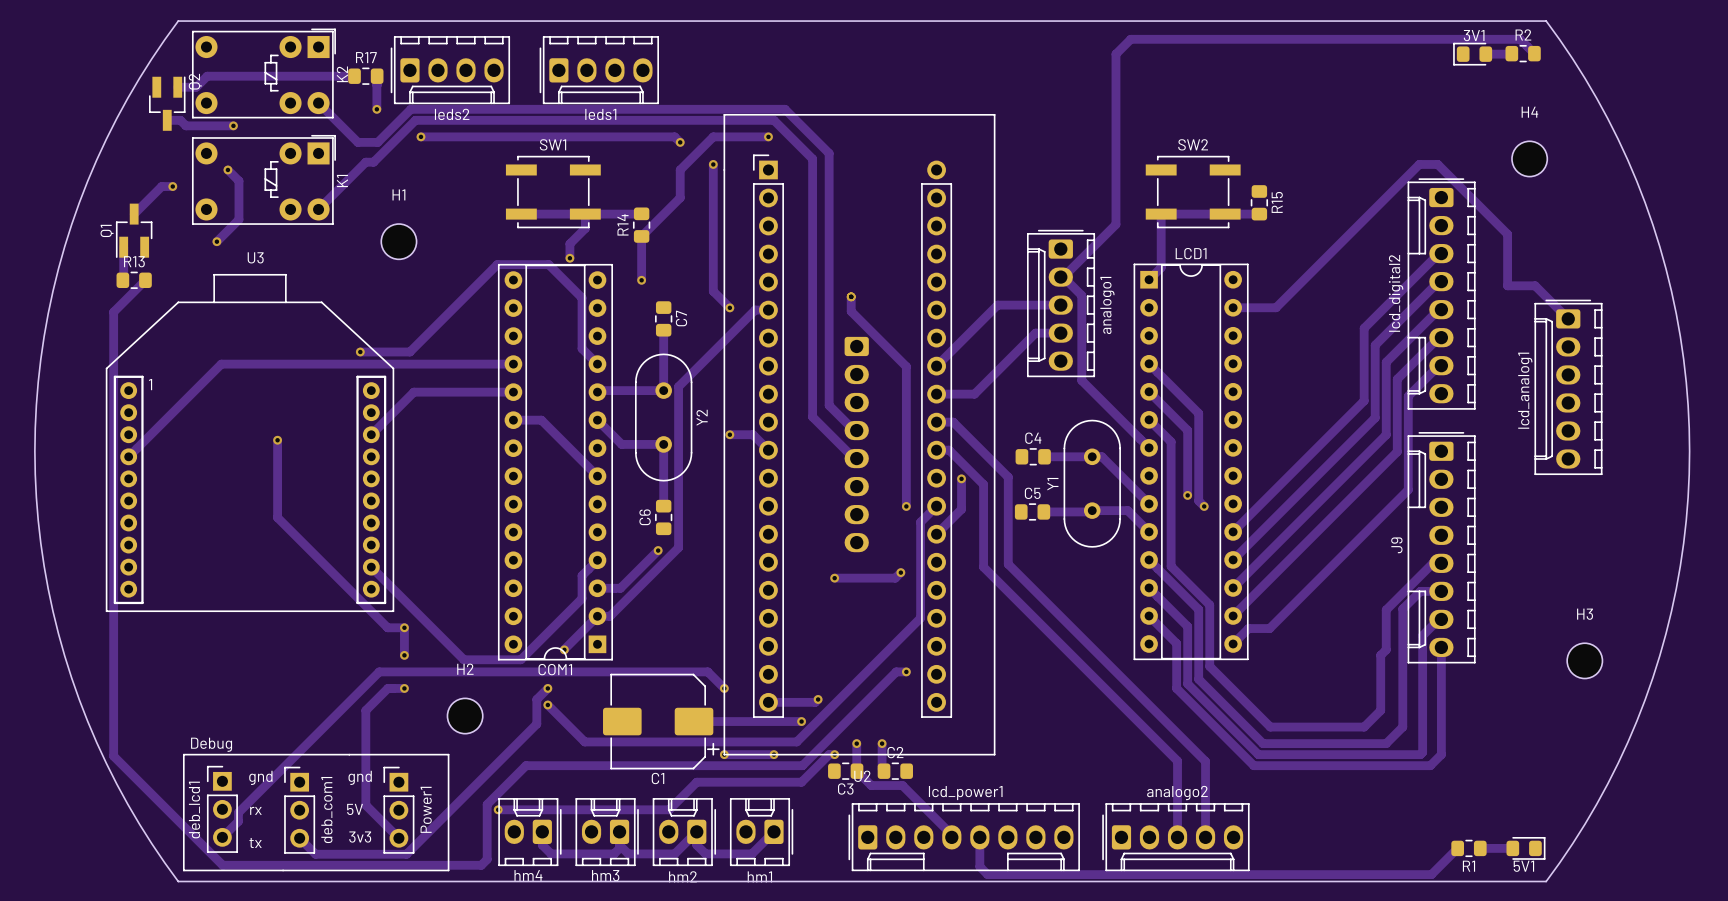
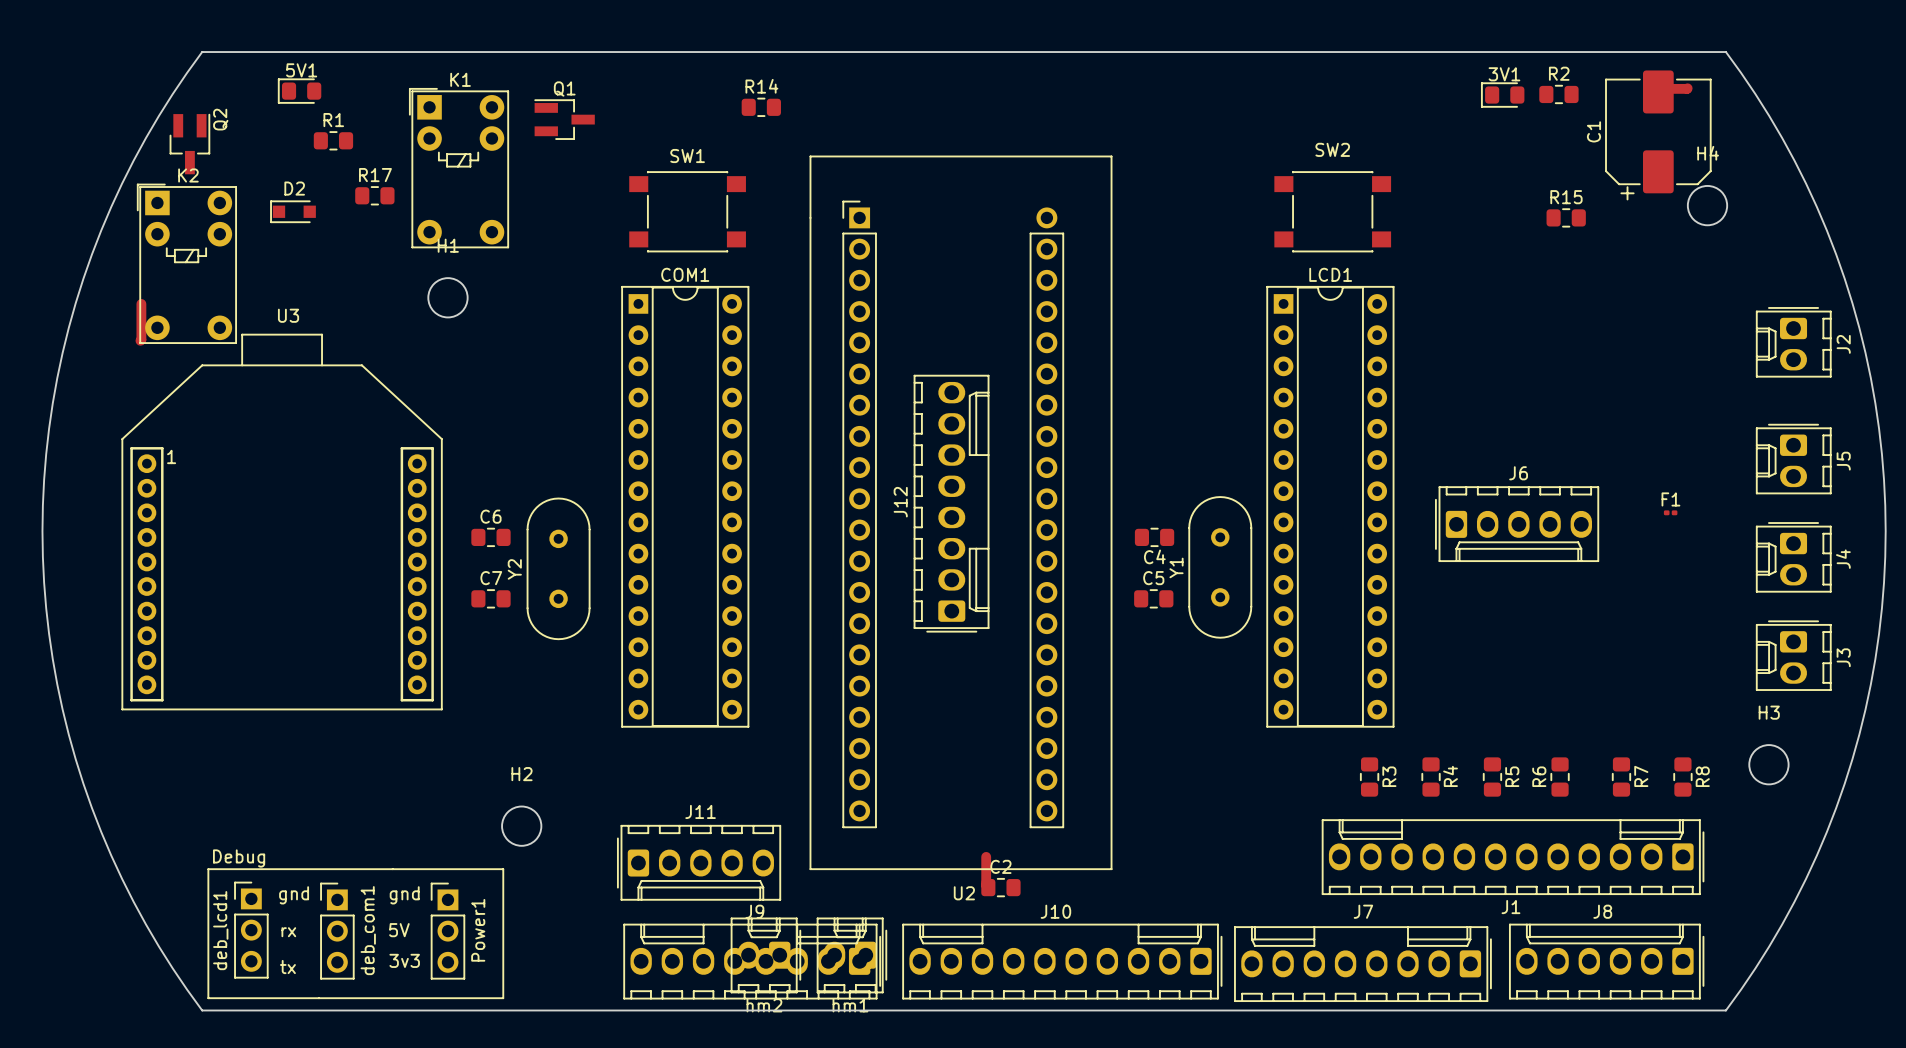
R2 position: (1523, 53) -> (1558, 94)
track: (1534, 53) (1520, 39) (1130, 39) (1115, 54) (1115, 224) (1063, 277) -> none
3V1 position: (1472, 54) -> (1502, 95)
leds2: (450, 70) -> none
leds1: (599, 70) -> none
K2 rotation: 0° (263, 73) -> 90° counterclockwise (186, 263)
K2 position: (263, 73) -> (186, 263)
track: (354, 76) (207, 76) (196, 87) (177, 87) -> none
R17 position: (365, 76) -> (374, 195)
track: (377, 76) (376, 109) -> none
track: (318, 103) (357, 142) (377, 142) (410, 109) (785, 109) (829, 153) (829, 405) (854, 430) (856, 430) -> none
via: (376, 109) -> none
track: (167, 120) (180, 120) (186, 125) (233, 125) -> none
via: (233, 125) -> none
track: (420, 136) (674, 136) (680, 142) -> none
via: (420, 136) -> none
track: (768, 136) (713, 136) (680, 169) (680, 197) (641, 236) (641, 280) -> none
via: (768, 136) -> none
via: (680, 142) -> none
SW1 footprint: [505, 155, 601, 229] -> [629, 171, 746, 253]
SW2 footprint: [1145, 155, 1241, 229] -> [1274, 171, 1392, 253]
D2: none -> (293, 211)
track: (713, 164) (713, 291) (729, 307) -> none
via: (713, 164) -> none
track: (227, 169) (238, 181) (238, 219) (216, 241) -> none
via: (227, 169) -> none
K1 rotation: 0° (263, 179) -> 90° counterclockwise (459, 168)
K1 position: (263, 179) -> (459, 168)
track: (172, 186) (161, 186) (134, 214) -> none
via: (172, 186) -> none
R15 rotation: 0° (1259, 202) -> 90° clockwise (1566, 217)
R15 position: (1259, 202) -> (1566, 217)
R15 name position: R15 (1277, 202) -> R15 (1566, 197)
track: (318, 209) (365, 162) (373, 162) (415, 120) (773, 120) (812, 158) (812, 416) (854, 458) (856, 458) -> none
track: (641, 213) (521, 214) -> none
track: (585, 214) (585, 228) (569, 243) (569, 258) -> none
track: (1259, 214) (1161, 214) (1161, 267) (1149, 279) -> none
R14 rotation: 0° (641, 225) -> 90° clockwise (761, 107)
R14 position: (641, 225) -> (761, 107)
Q1 rotation: 0° (134, 230) -> 90° clockwise (564, 119)
Q1 position: (134, 230) -> (564, 119)
via: (216, 241) -> none
track: (1441, 253) (1438, 253) (1364, 328) (1364, 400) (1233, 531) -> none
via: (569, 258) -> none
track: (1063, 277) (1081, 295) (1081, 380) (1149, 447) -> none
R13: (134, 280) -> none
track: (145, 280) (113, 312) (113, 756) (222, 865) (481, 865) (487, 859) (487, 804) (526, 765) (802, 765) (896, 671) (906, 671) -> none
via: (641, 280) -> none
track: (1441, 281) (1438, 281) (1375, 345) (1375, 417) (1233, 559) -> none
J2: none -> (1793, 342)
lcd_digital2: (1441, 294) -> none
track: (851, 296) (851, 311) (906, 366) (906, 506) -> none
via: (851, 296) -> none
analogo1: (1061, 303) -> none
track: (1060, 305) (997, 305) (936, 366) -> none
via: (729, 307) -> none
track: (1233, 307) (1276, 307) (1419, 164) (1437, 164) (1507, 234) (1507, 285) (1535, 285) (1568, 318) -> none
track: (1441, 309) (1438, 309) (1386, 362) (1386, 434) (1233, 587) -> none
track: (768, 310) (755, 310) (678, 386) (678, 547) (609, 616) (597, 616) (564, 649) -> none
C7 rotation: 0° (663, 318) -> 90° clockwise (490, 598)
C7 position: (663, 318) -> (490, 598)
C7 name position: C7 (681, 318) -> C7 (491, 578)
track: (663, 330) (663, 390) (599, 390) (597, 392) -> none
track: (1060, 333) (1035, 333) (974, 394) (936, 394) -> none
track: (1441, 337) (1438, 337) (1397, 379) (1397, 451) (1233, 615) -> none
track: (360, 351) (409, 351) (497, 264) (548, 264) (582, 297) (582, 348) (597, 364) -> none
via: (360, 351) -> none
track: (1149, 363) (1198, 413) (1198, 500) (1204, 506) -> none
track: (513, 364) (221, 364) (128, 456) -> none
track: (1441, 365) (1438, 365) (1408, 396) (1408, 489) (1269, 628) (1248, 628) (1233, 643) -> none
J5: none -> (1793, 459)
lcd_analog1: (1568, 387) -> none
track: (1149, 391) (1187, 430) (1187, 495) -> none
track: (513, 392) (413, 392) (371, 434) -> none
Y2 position: (663, 417) -> (558, 568)
Y2 name position: Y2 (702, 417) -> Y2 (514, 569)
track: (1149, 419) (1171, 441) (1171, 566) (1209, 605) (1209, 666) (1270, 727) (1364, 727) (1380, 710) (1380, 655) (1386, 649) (1386, 609) (1432, 563) (1441, 563) -> none
track: (513, 420) (541, 420) (597, 476) -> none
track: (597, 420) (621, 444) (663, 444) (663, 506) -> none
track: (936, 422) (953, 422) (1008, 477) (1008, 564) (1205, 761) (1205, 837) -> none
track: (729, 434) (753, 434) (768, 450) -> none
via: (729, 434) -> none
F1: none -> (1670, 512)
C4 name position: C4 (1033, 438) -> C4 (1154, 556)
track: (277, 440) (277, 517) (387, 627) (404, 627) (404, 655) -> none
via: (277, 440) -> none
J12 side: bottom (856, 444) -> top (951, 503)
J6: none -> (1517, 524)
track: (936, 450) (949, 450) (983, 484) (983, 567) (1177, 761) (1177, 837) -> none
track: (1044, 456) (1101, 456) (1149, 503) -> none
LCD1 position: (1191, 461) -> (1330, 506)
COM1 rotation: 0° (555, 462) -> 180° (685, 506)
J4: none -> (1793, 557)
track: (961, 478) (961, 509) (936, 534) -> none
via: (961, 478) -> none
via: (1187, 495) -> none
via: (906, 506) -> none
track: (936, 506) (920, 522) (920, 618) (796, 741) (584, 741) (547, 705) -> none
via: (1204, 506) -> none
track: (1043, 511) (1127, 510) (1149, 531) -> none
C6 rotation: 0° (663, 517) -> 90° clockwise (490, 537)
C6 position: (663, 517) -> (490, 537)
J9 rotation: 0° (1441, 547) -> 90° clockwise (752, 961)
J9 position: (1441, 547) -> (752, 961)
track: (658, 550) (620, 588) (597, 588) -> none
via: (658, 550) -> none
track: (1149, 559) (1198, 609) (1198, 679) (1263, 743) (1386, 743) (1402, 727) (1402, 609) (1420, 591) (1441, 591) -> none
track: (597, 560) (582, 575) (582, 598) (520, 659) (463, 659) (371, 567) -> none
J3: none -> (1793, 655)
track: (900, 572) (895, 578) (834, 578) -> none
via: (900, 572) -> none
via: (834, 578) -> none
track: (1149, 587) (1187, 626) (1187, 683) (1258, 754) (1420, 754) (1422, 752) (1422, 635) (1438, 619) (1441, 619) -> none
track: (1149, 615) (1176, 643) (1176, 688) (1253, 765) (1430, 765) (1441, 754) (1441, 647) -> none
via: (404, 627) -> none
via: (564, 649) -> none
via: (404, 655) -> none
via: (906, 671) -> none
R3: none -> (1369, 777)
R4: none -> (1431, 777)
R5: none -> (1492, 777)
R6: none -> (1560, 777)
R7: none -> (1621, 777)
R8: none -> (1682, 777)
track: (404, 688) (387, 688) (365, 710) (365, 805) (398, 838) -> none
via: (404, 688) -> none
track: (547, 688) (536, 699) (536, 724) (406, 854) (315, 854) (299, 838) -> none
via: (547, 688) -> none
track: (724, 688) (707, 671) (379, 671) (238, 812) (238, 821) (222, 837) -> none
via: (724, 688) -> none
track: (818, 699) (815, 702) (768, 702) -> none
via: (818, 699) -> none
via: (547, 705) -> none
C1 rotation: 0° (661, 721) -> 90° clockwise (1658, 135)
C1 position: (661, 721) -> (1658, 135)
track: (694, 721) (801, 721) -> none
via: (801, 721) -> none
track: (856, 743) (856, 770) (871, 785) (902, 785) (951, 834) (951, 837) -> none
via: (856, 743) -> none
via: (882, 743) -> none
J1: none -> (1513, 857)
J11: none -> (699, 862)
track: (724, 754) (773, 754) -> none
via: (724, 754) -> none
via: (773, 754) -> none
track: (834, 754) (829, 754) (801, 782) (696, 782) (669, 809) (498, 809) -> none
via: (834, 754) -> none
C3: (845, 771) -> none
via: (498, 809) -> none
track: (542, 831) (542, 845) (551, 853) (614, 853) (619, 848) (619, 831) -> none
track: (773, 831) (751, 853) (705, 853) (696, 845) (696, 831) (674, 853) (628, 853) (619, 845) -> none
hm4: (529, 832) -> none
hm3: (607, 832) -> none
J10: none -> (1062, 961)
lcd_power1: (964, 837) -> none
track: (979, 837) (979, 866) (987, 874) (1431, 874) (1457, 848) -> none
analogo2: (1175, 837) -> none
J8: none -> (1606, 961)
J7: none -> (1362, 964)
R1 position: (1468, 848) -> (333, 140)
track: (1480, 848) (1512, 848) -> none
5V1 rotation: 0° (1525, 848) -> 180° (299, 91)
5V1 position: (1525, 848) -> (299, 91)
R1 name position: R1 (1468, 866) -> R1 (333, 120)

